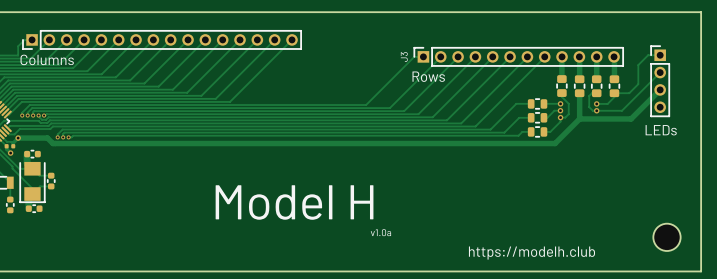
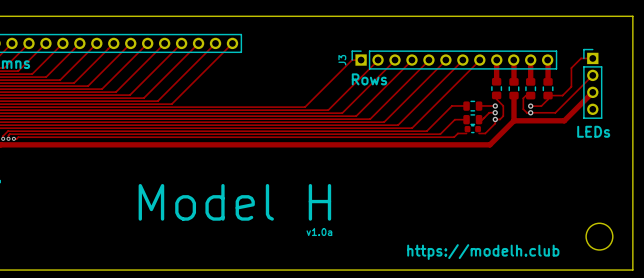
part footprint: [527, 126, 548, 138] -> [464, 125, 481, 133]

